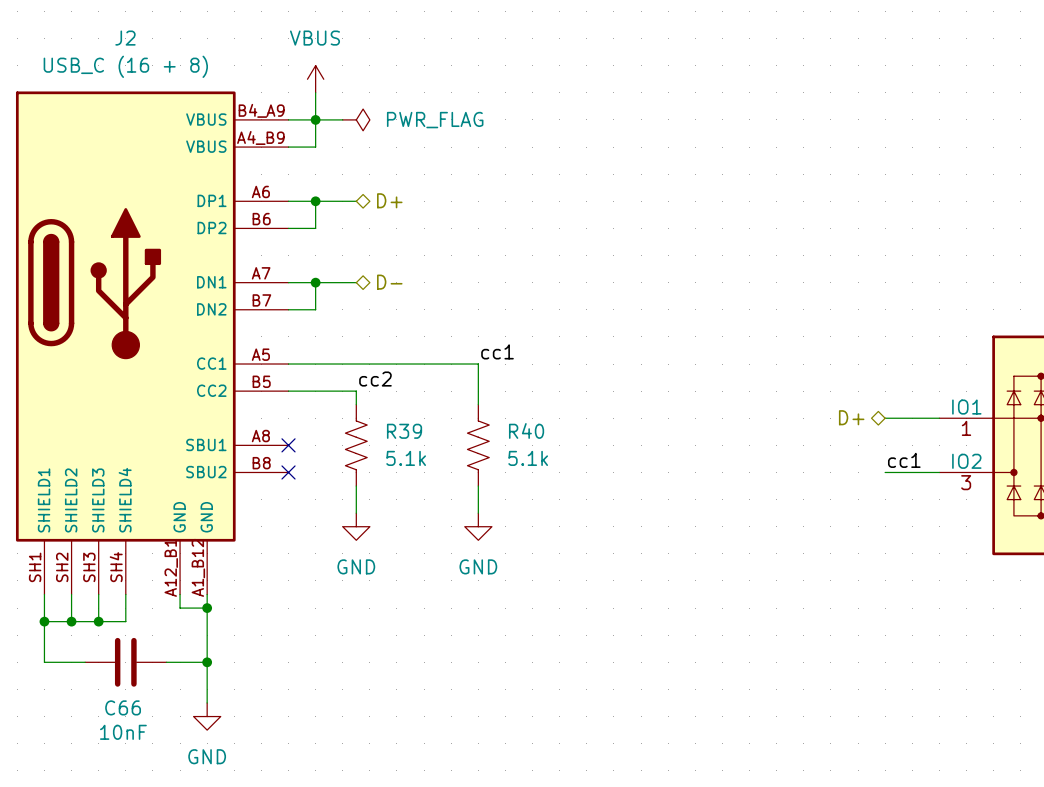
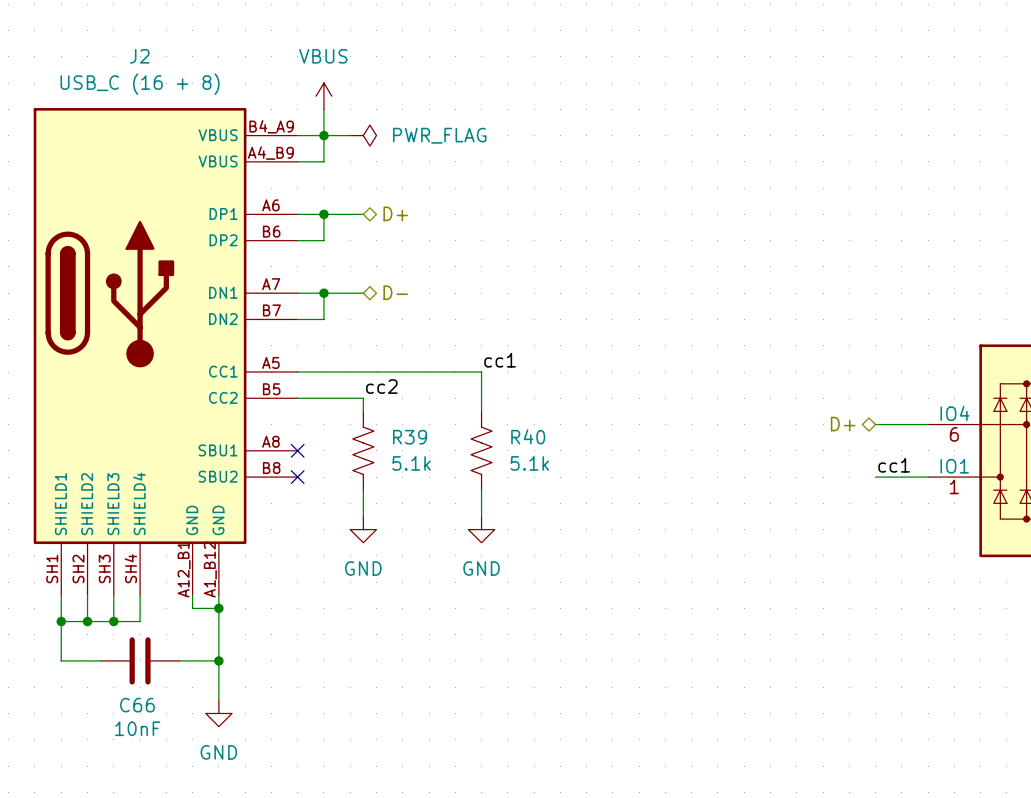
part pin name: IO1 (966, 407) -> IO4 (955, 413)
part pin number: 1 (966, 428) -> 6 (954, 434)
part pin name: IO2 (966, 461) -> IO1 (954, 466)
part pin number: 3 (966, 482) -> 1 (954, 486)

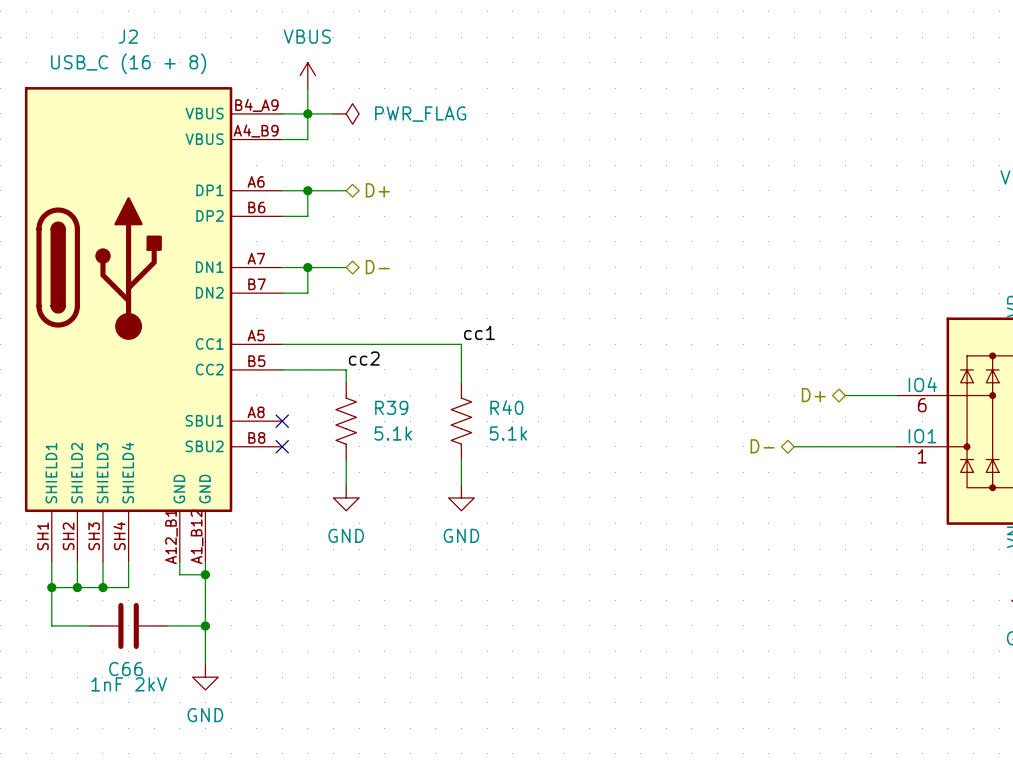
label: cc1 (894, 465) -> none
hierarchical label: none -> D- (762, 446)
wire: none -> (794, 446) (845, 446)
C66 value: 10nF (137, 728) -> 1nF 2kV (129, 684)

